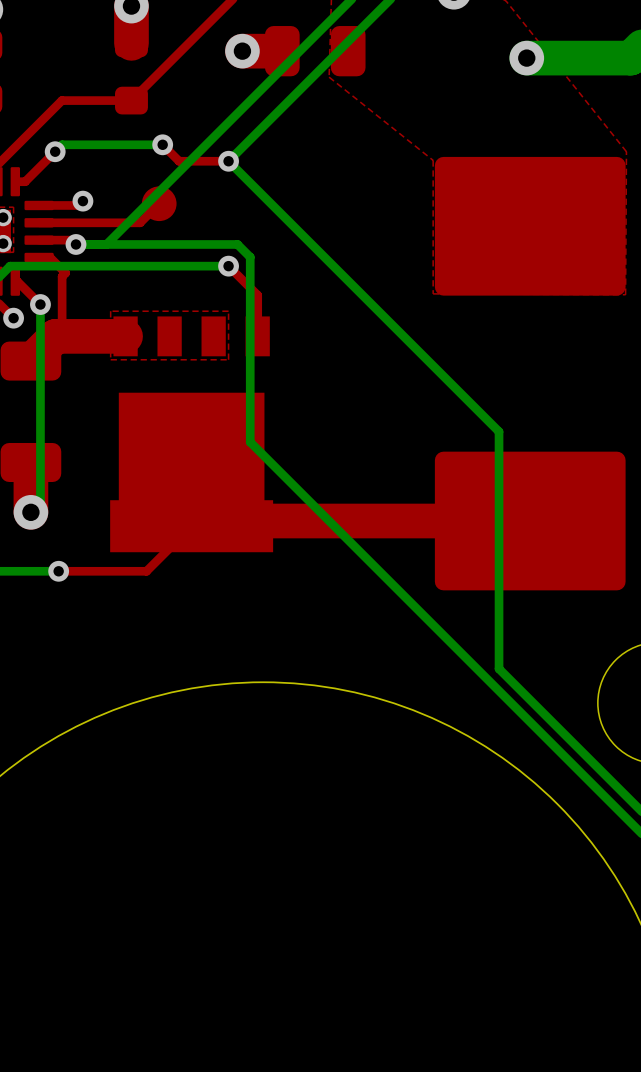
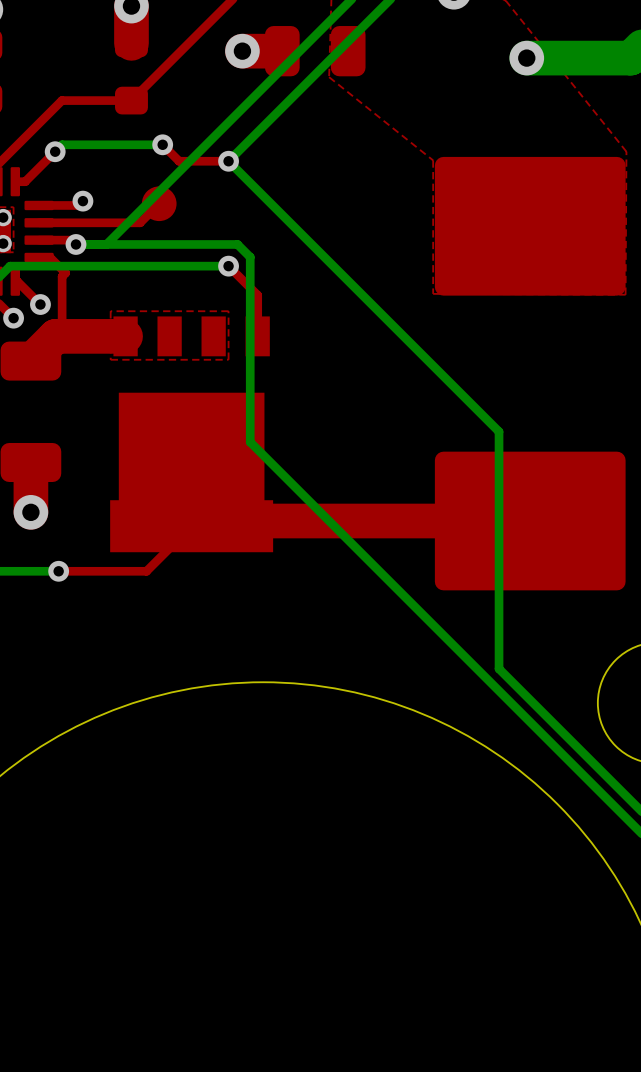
bottom track: (40, 304) (40, 502) (30, 512) -> none

